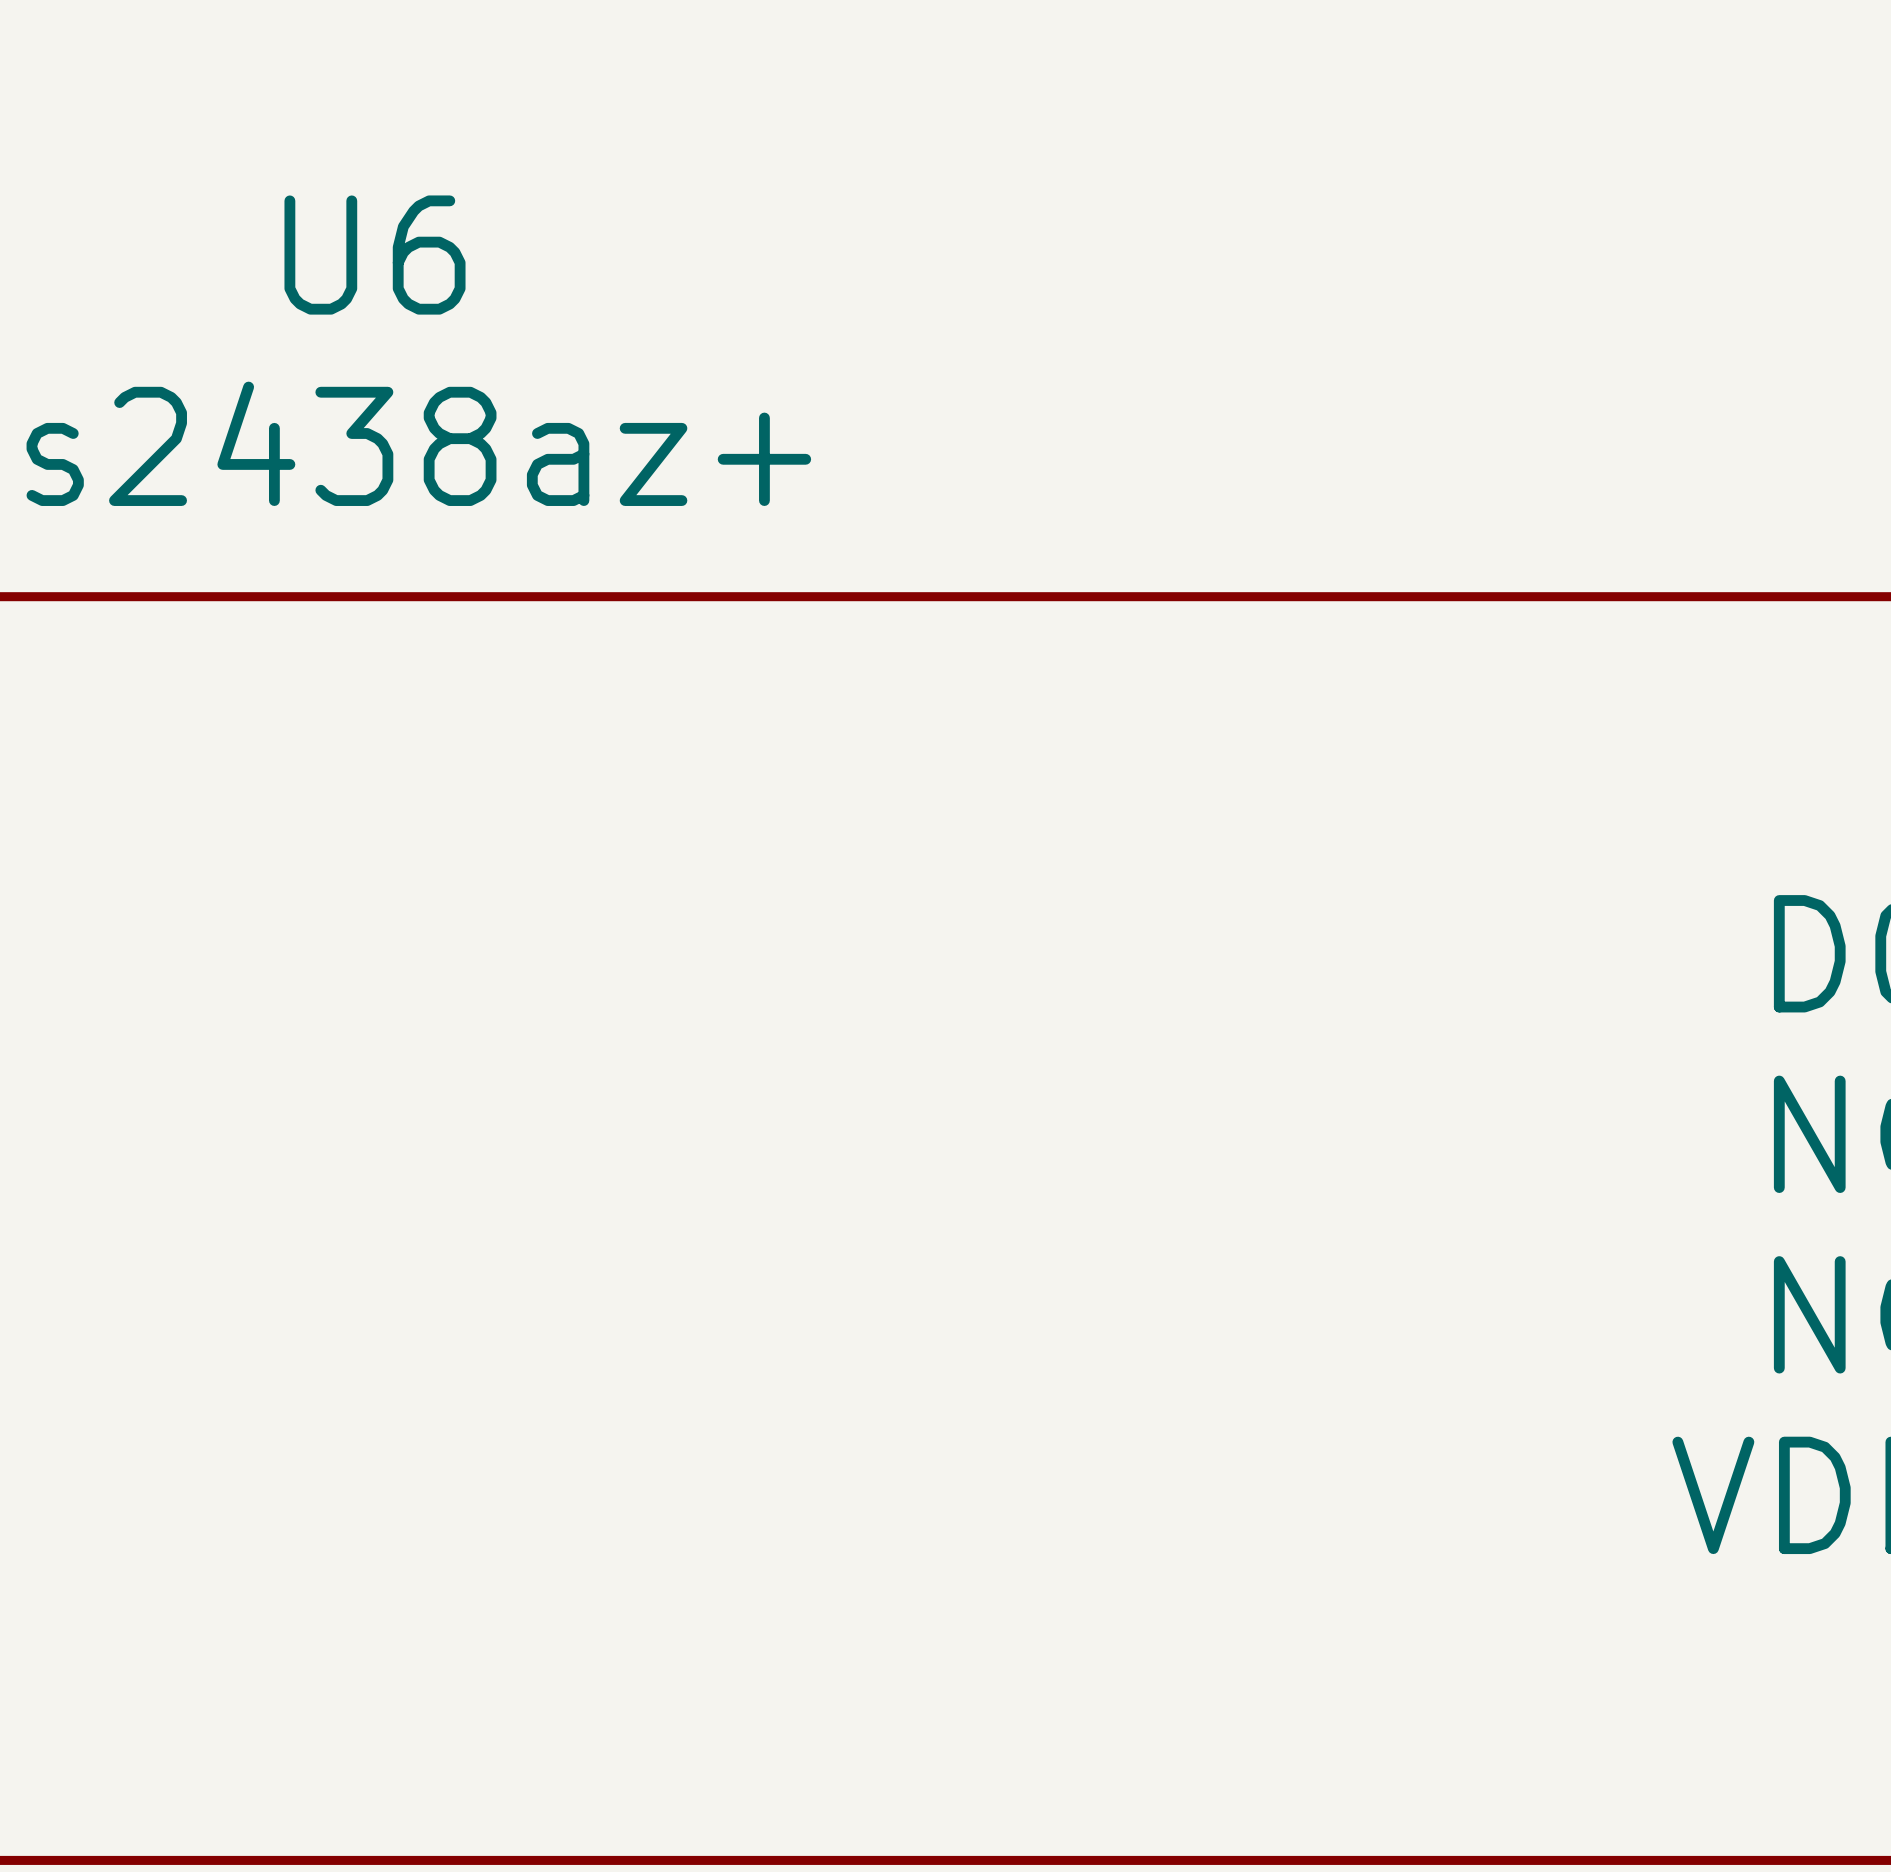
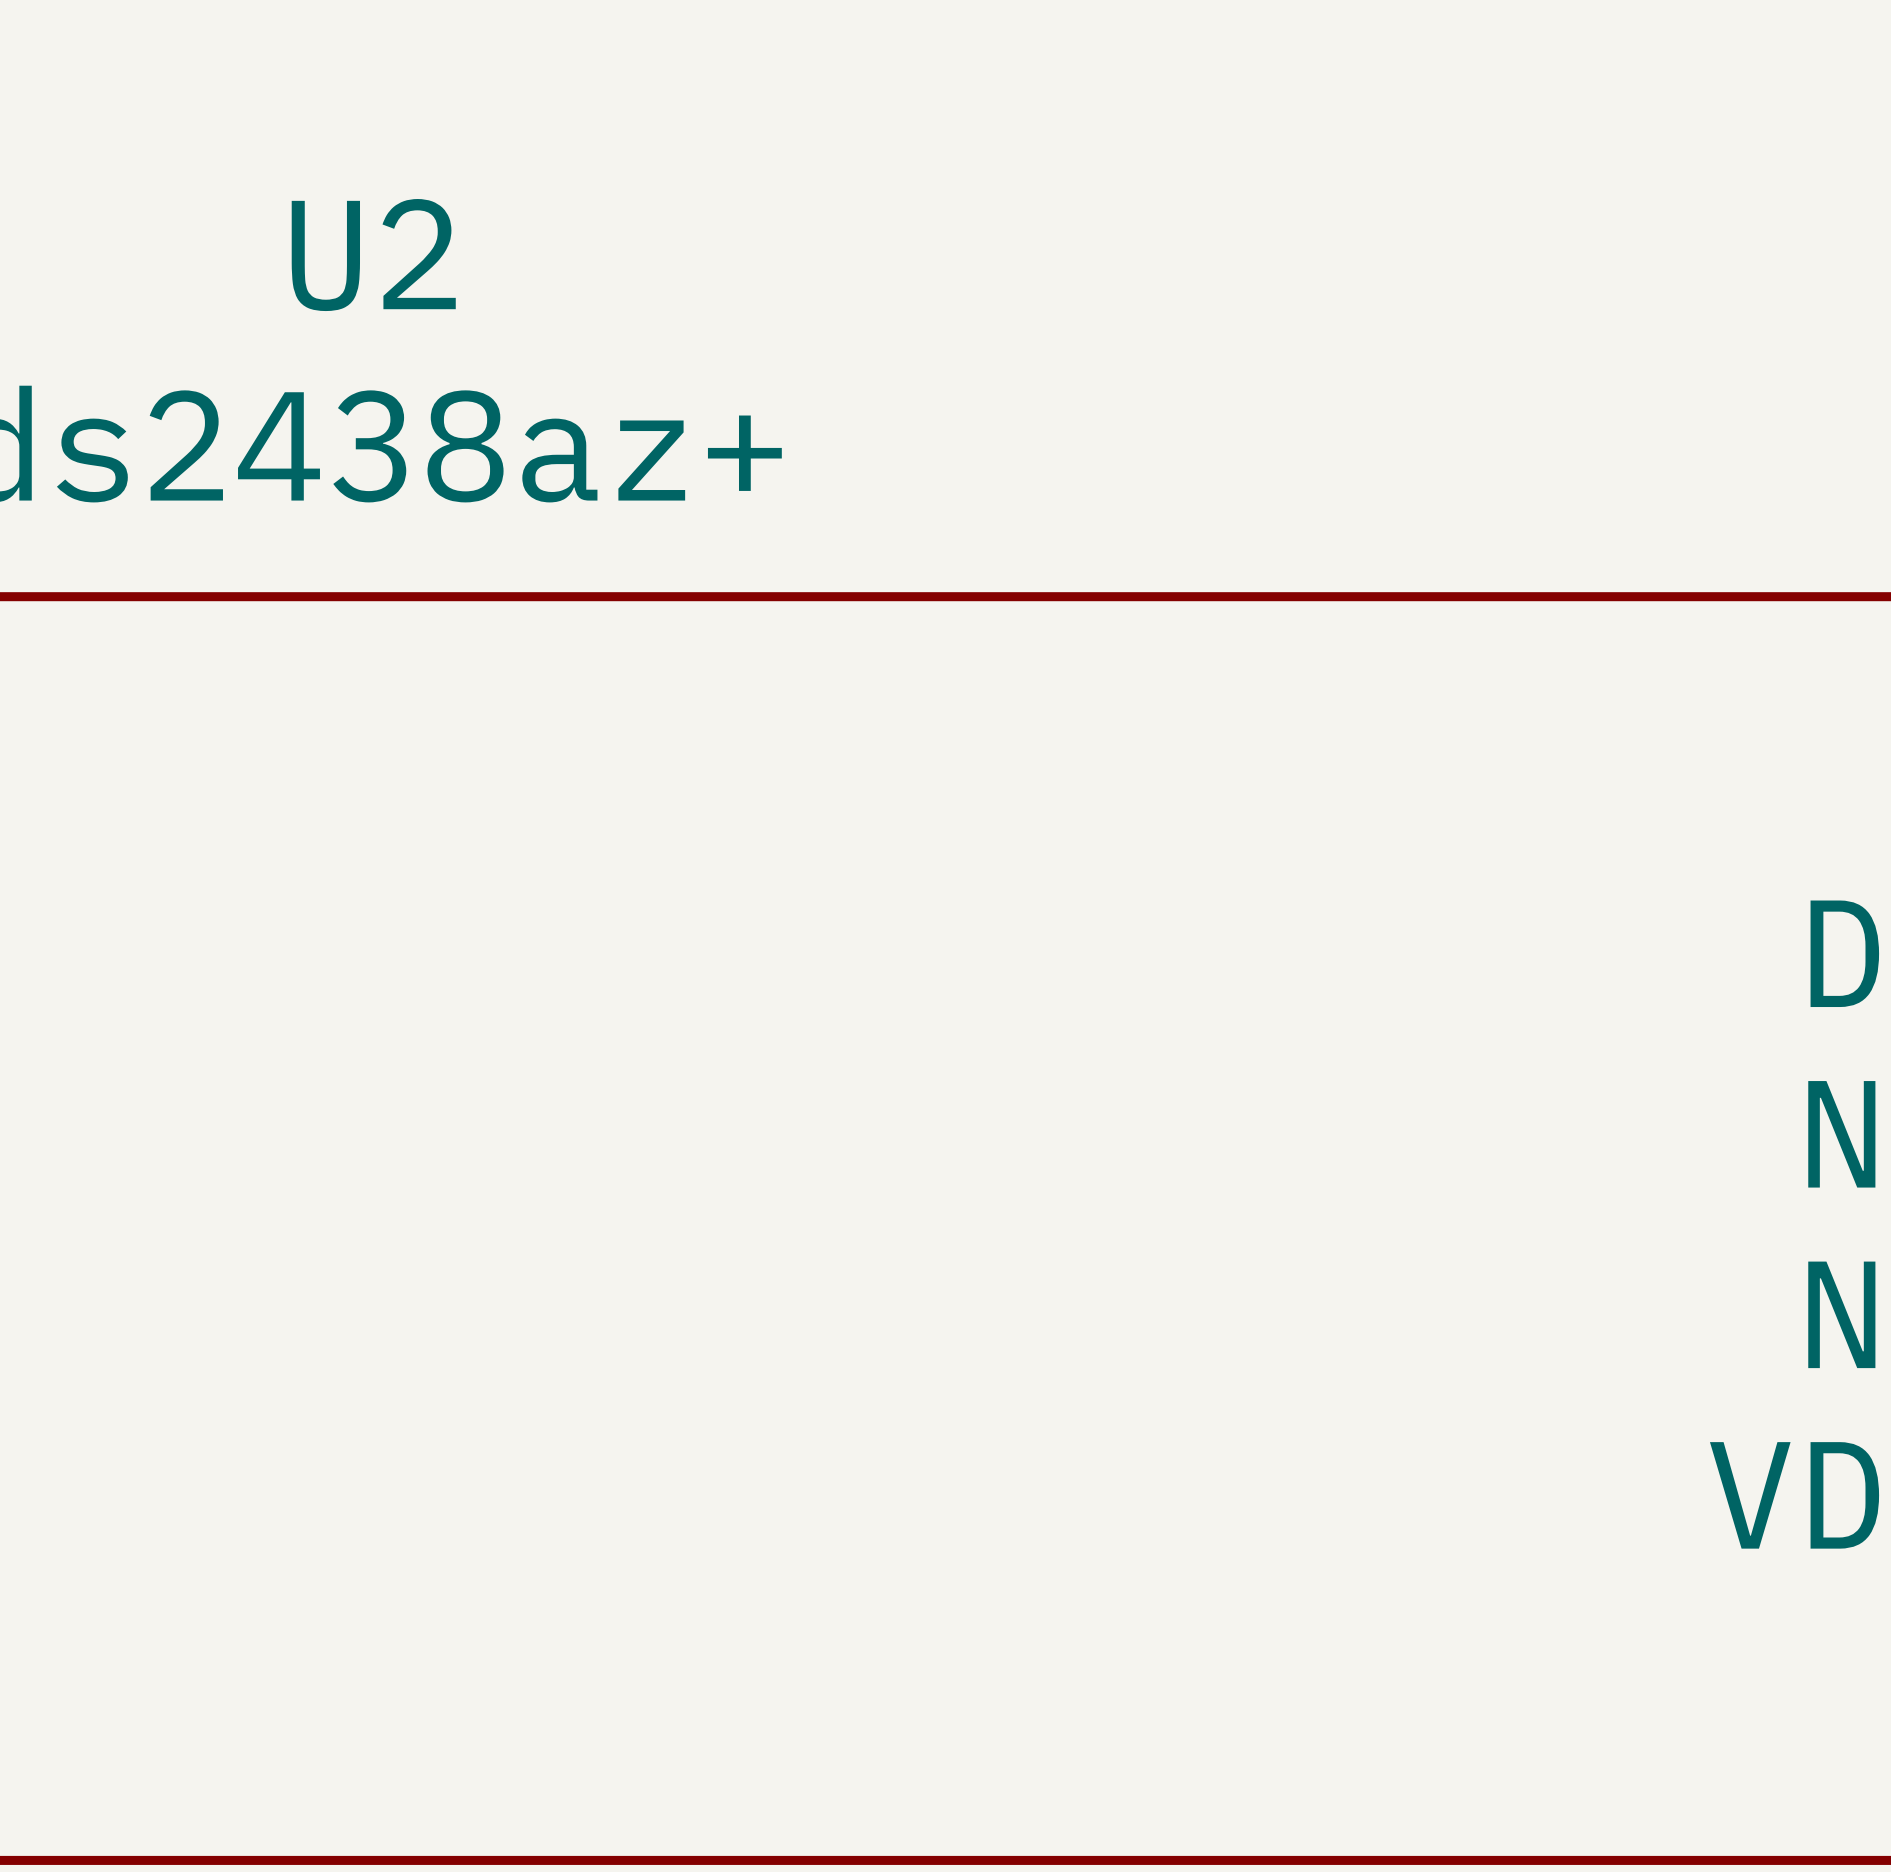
U6 name: U6 (374, 255) -> U2 (373, 255)

